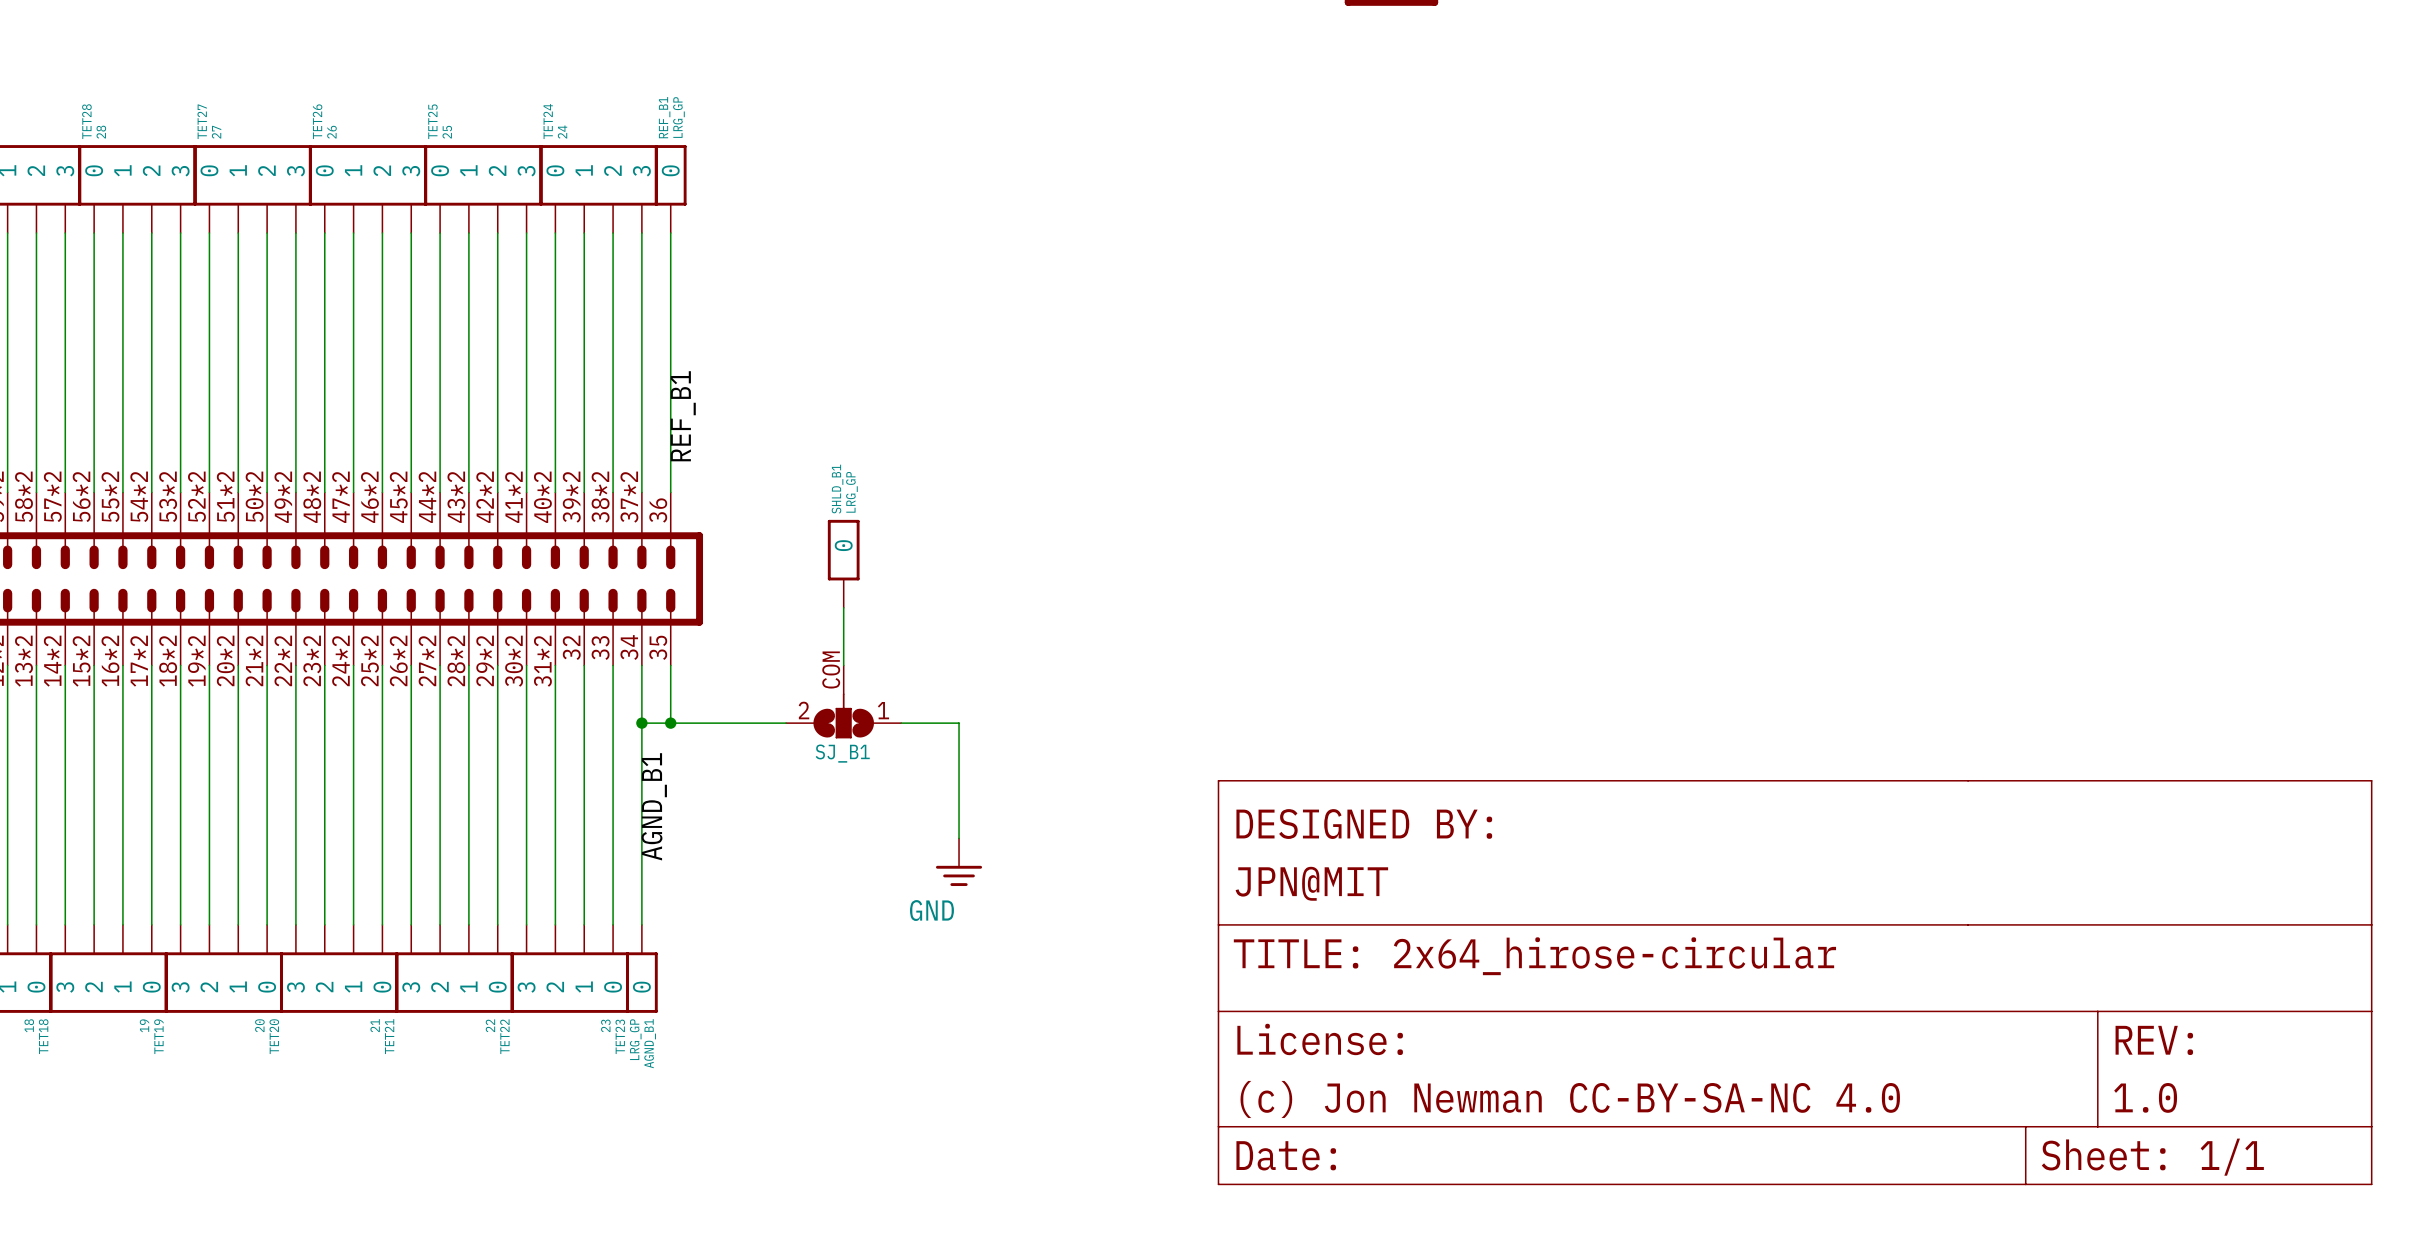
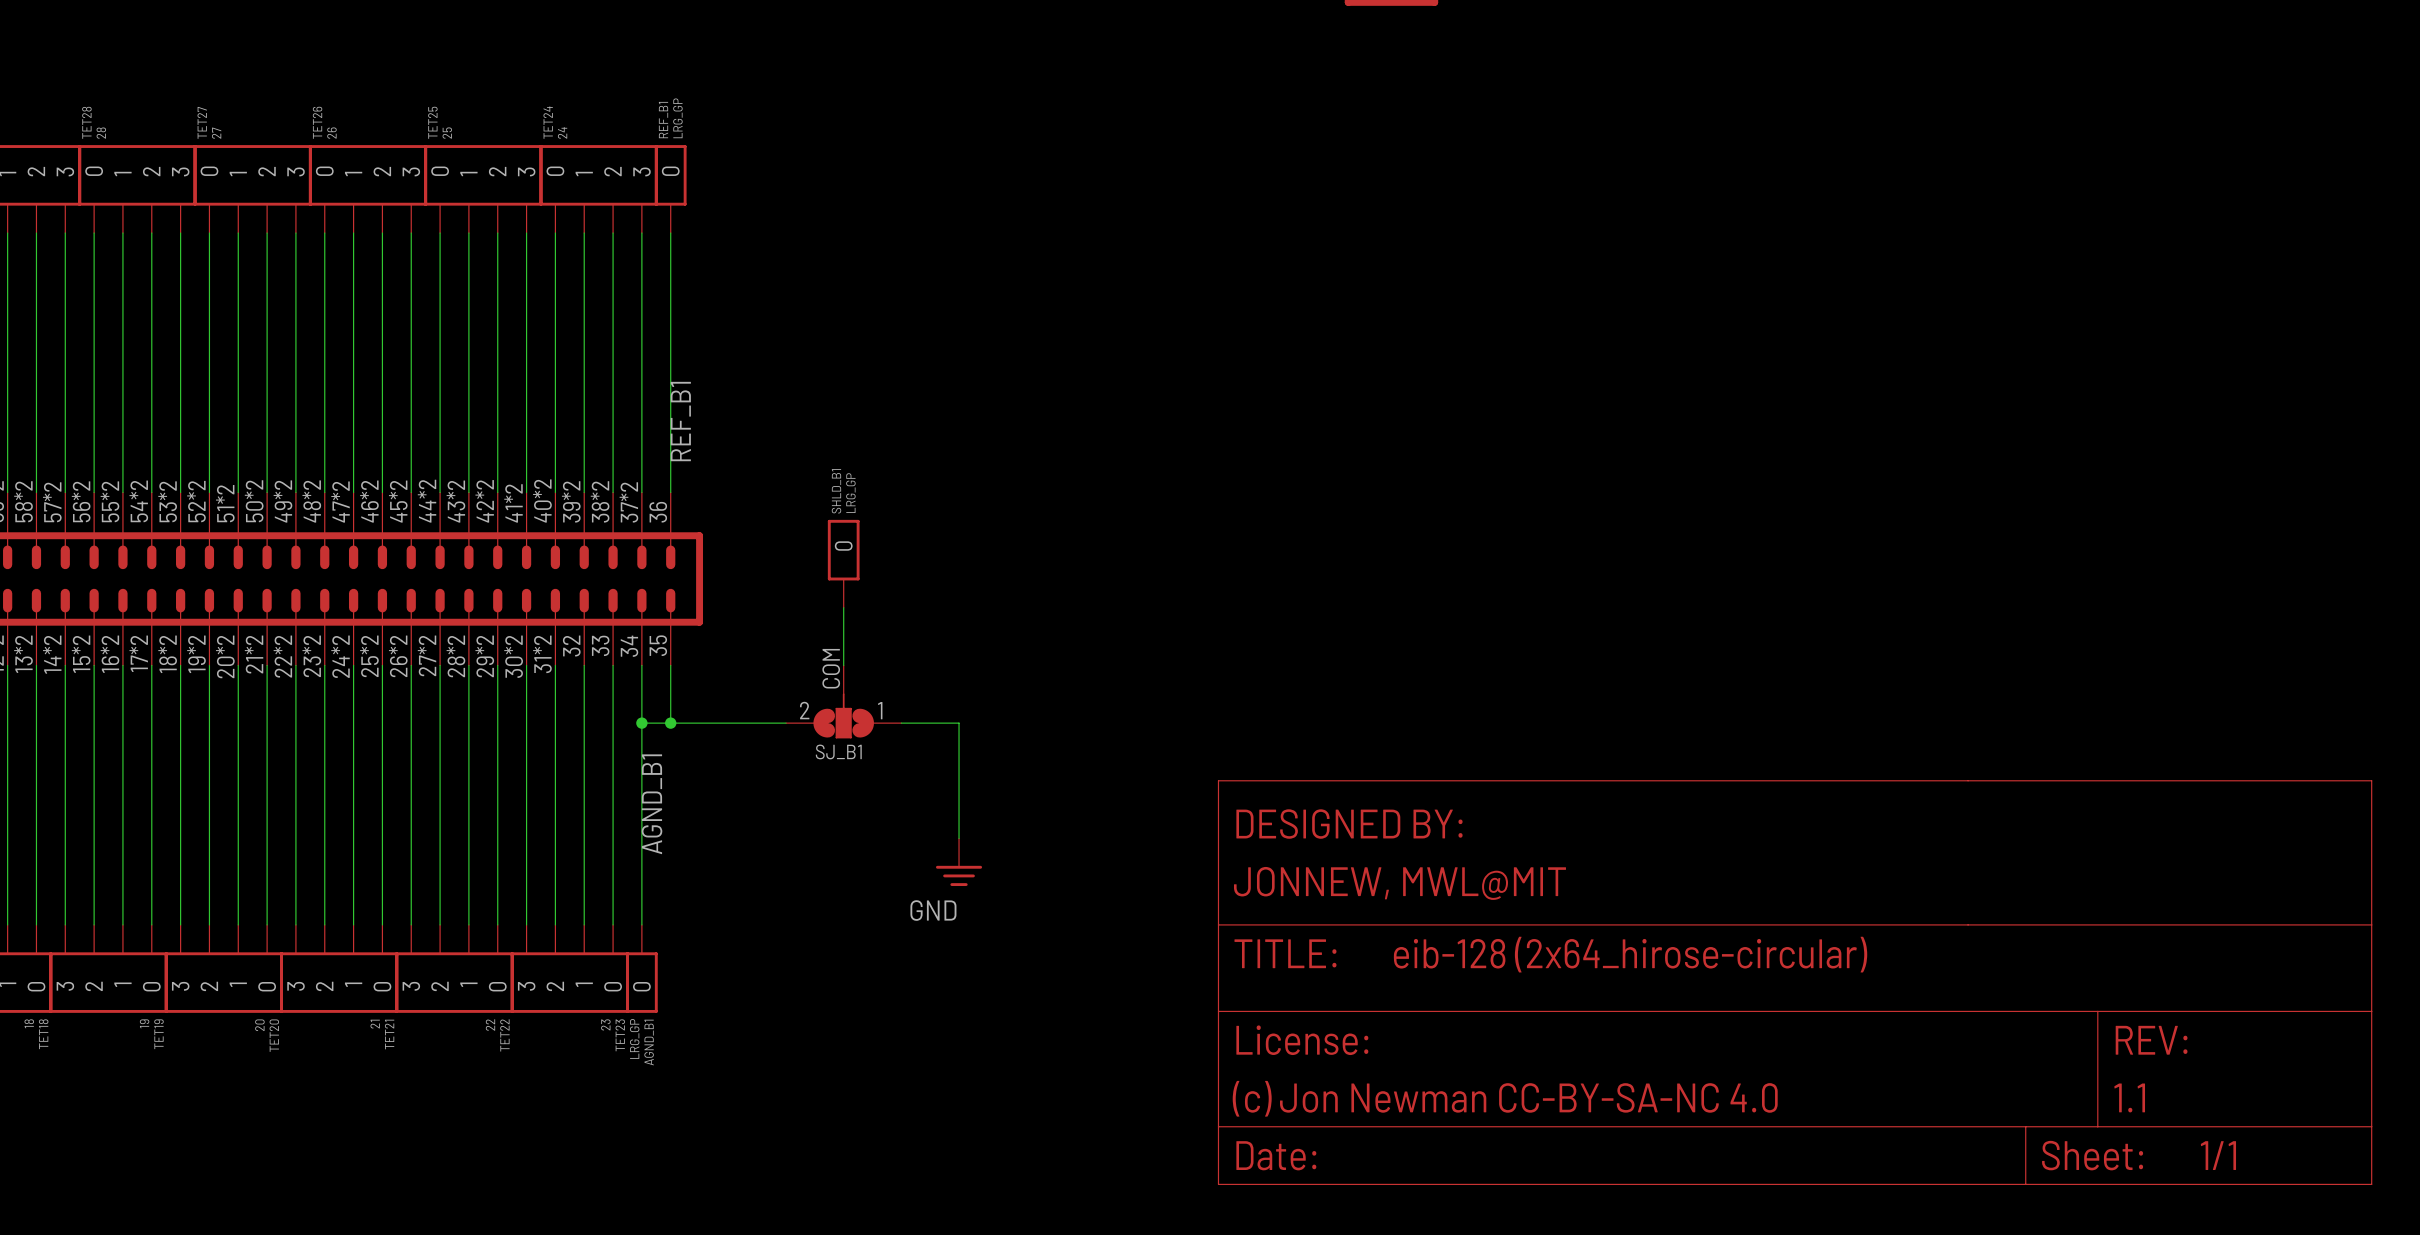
part text: JPN@MIT (1311, 883) -> JONNEW, MWL@MIT (1399, 883)
part text: 2x64_hirose-circular (1614, 956) -> eib-128 (2x64_hirose-circular) (1630, 954)
part text: 1.0 (2145, 1097) -> 1.1 (2129, 1097)

